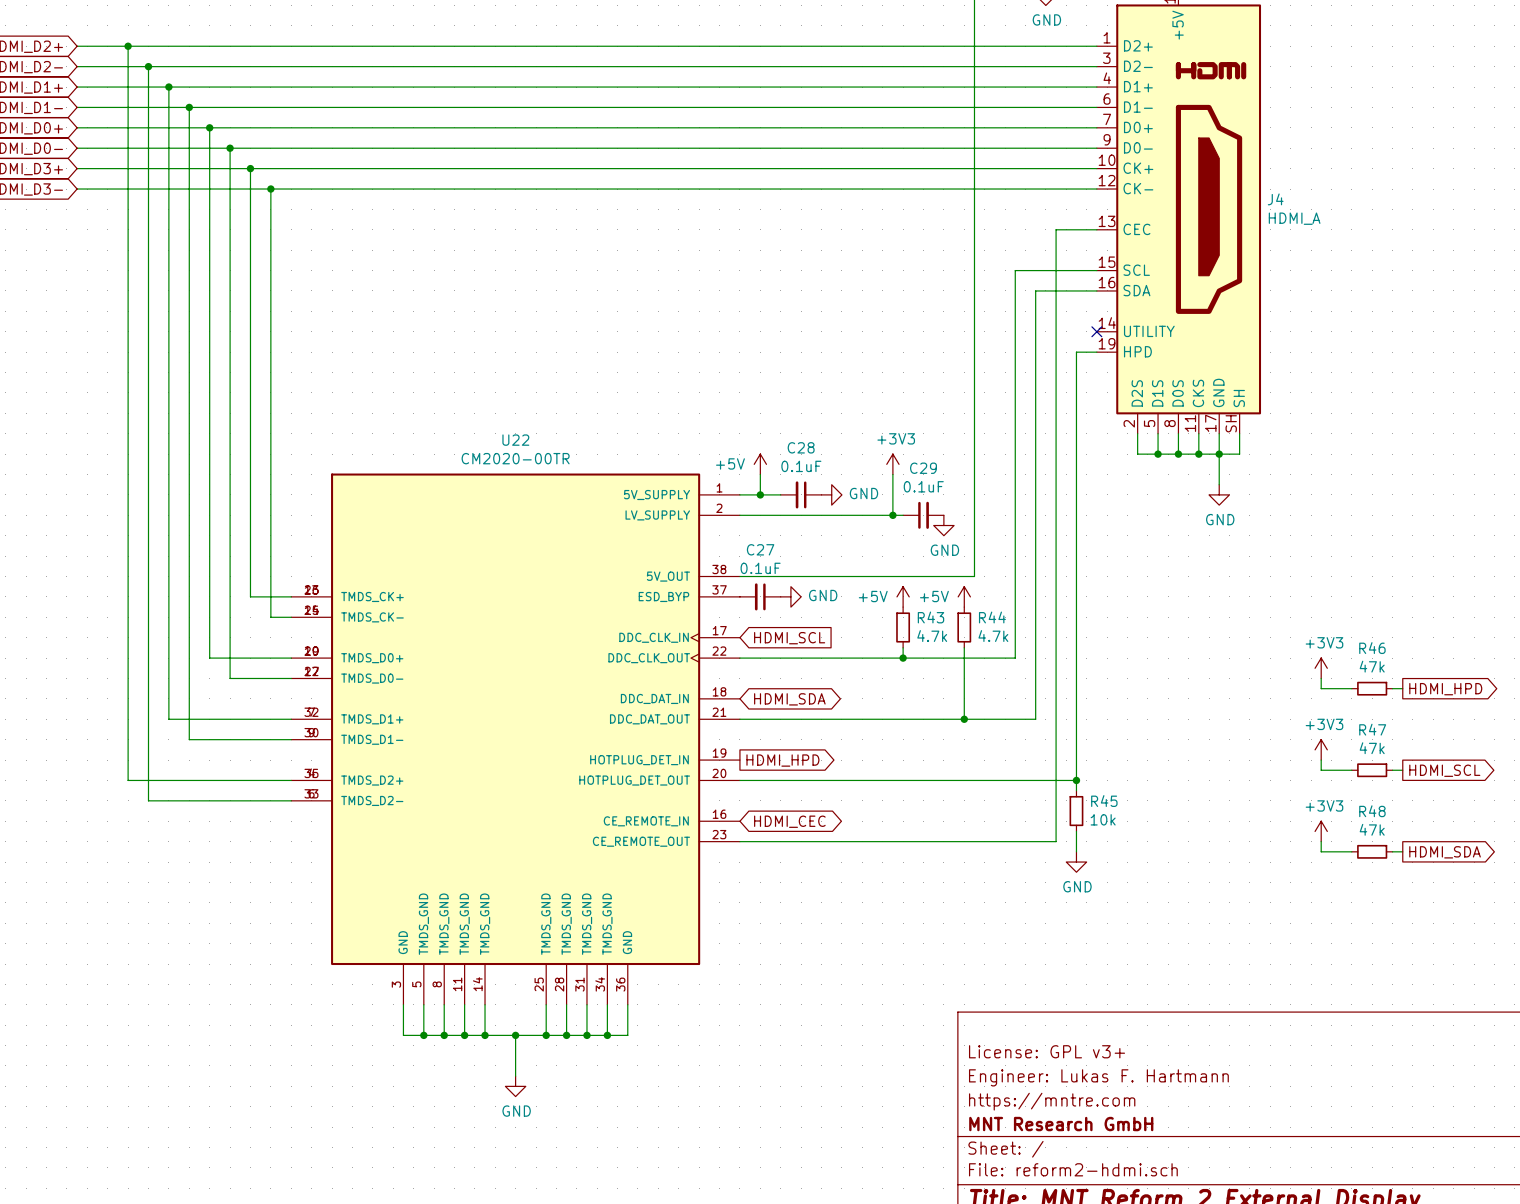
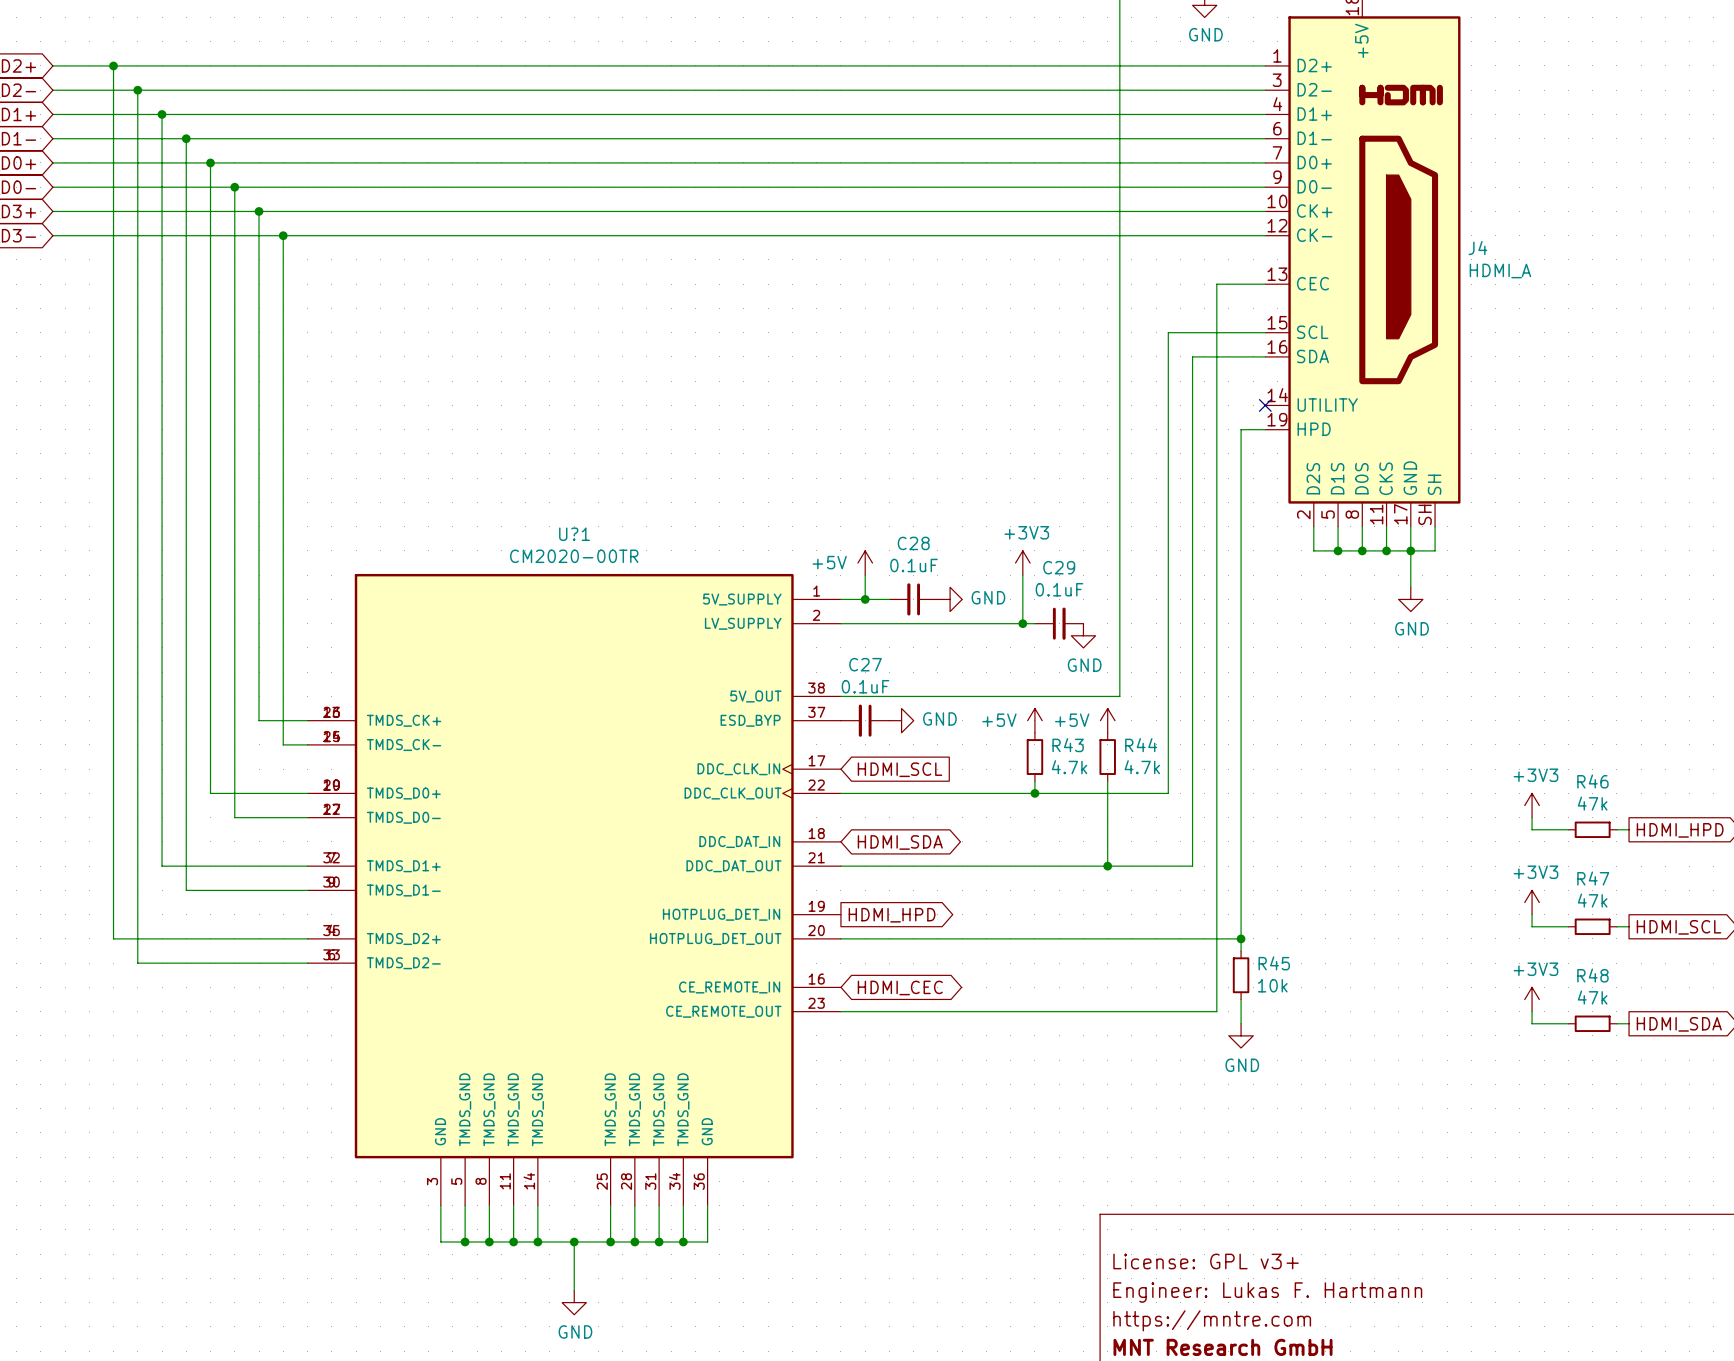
U22 name: U22 (515, 440) -> U?1 (574, 534)

